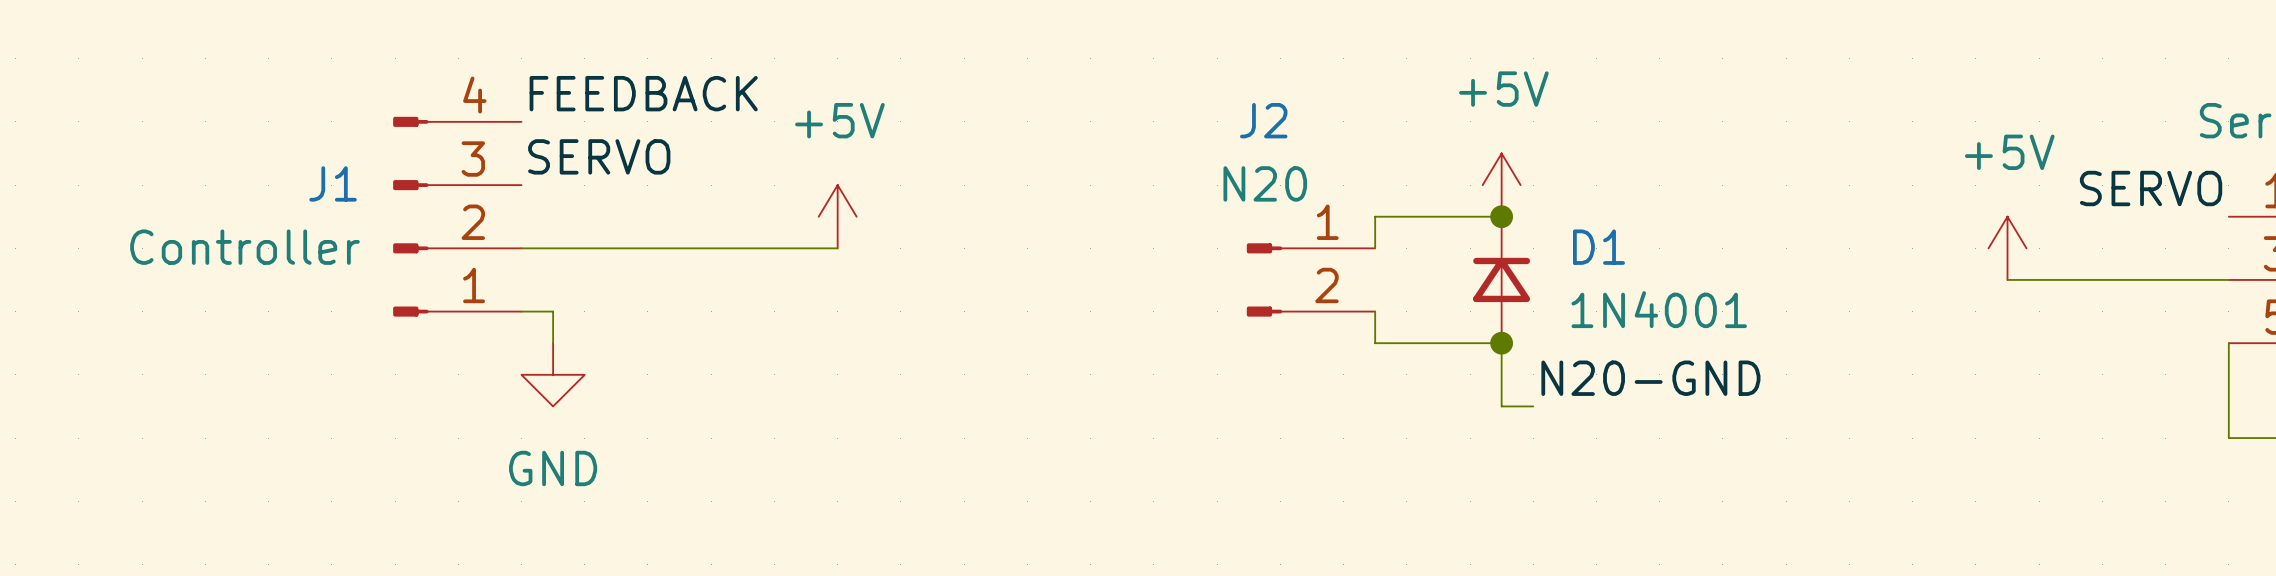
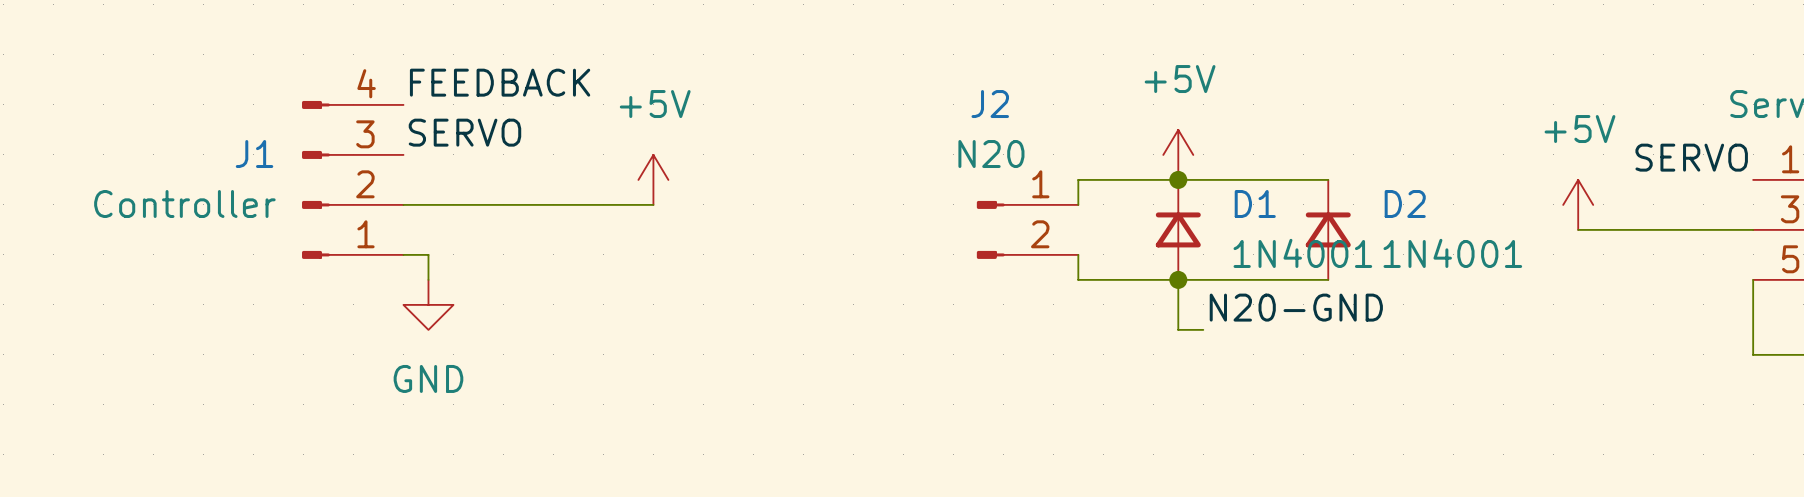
wire: none -> (1178, 179) (1328, 179)
D2: none -> 1N4001 (1328, 229)
wire: none -> (1178, 279) (1328, 279)

